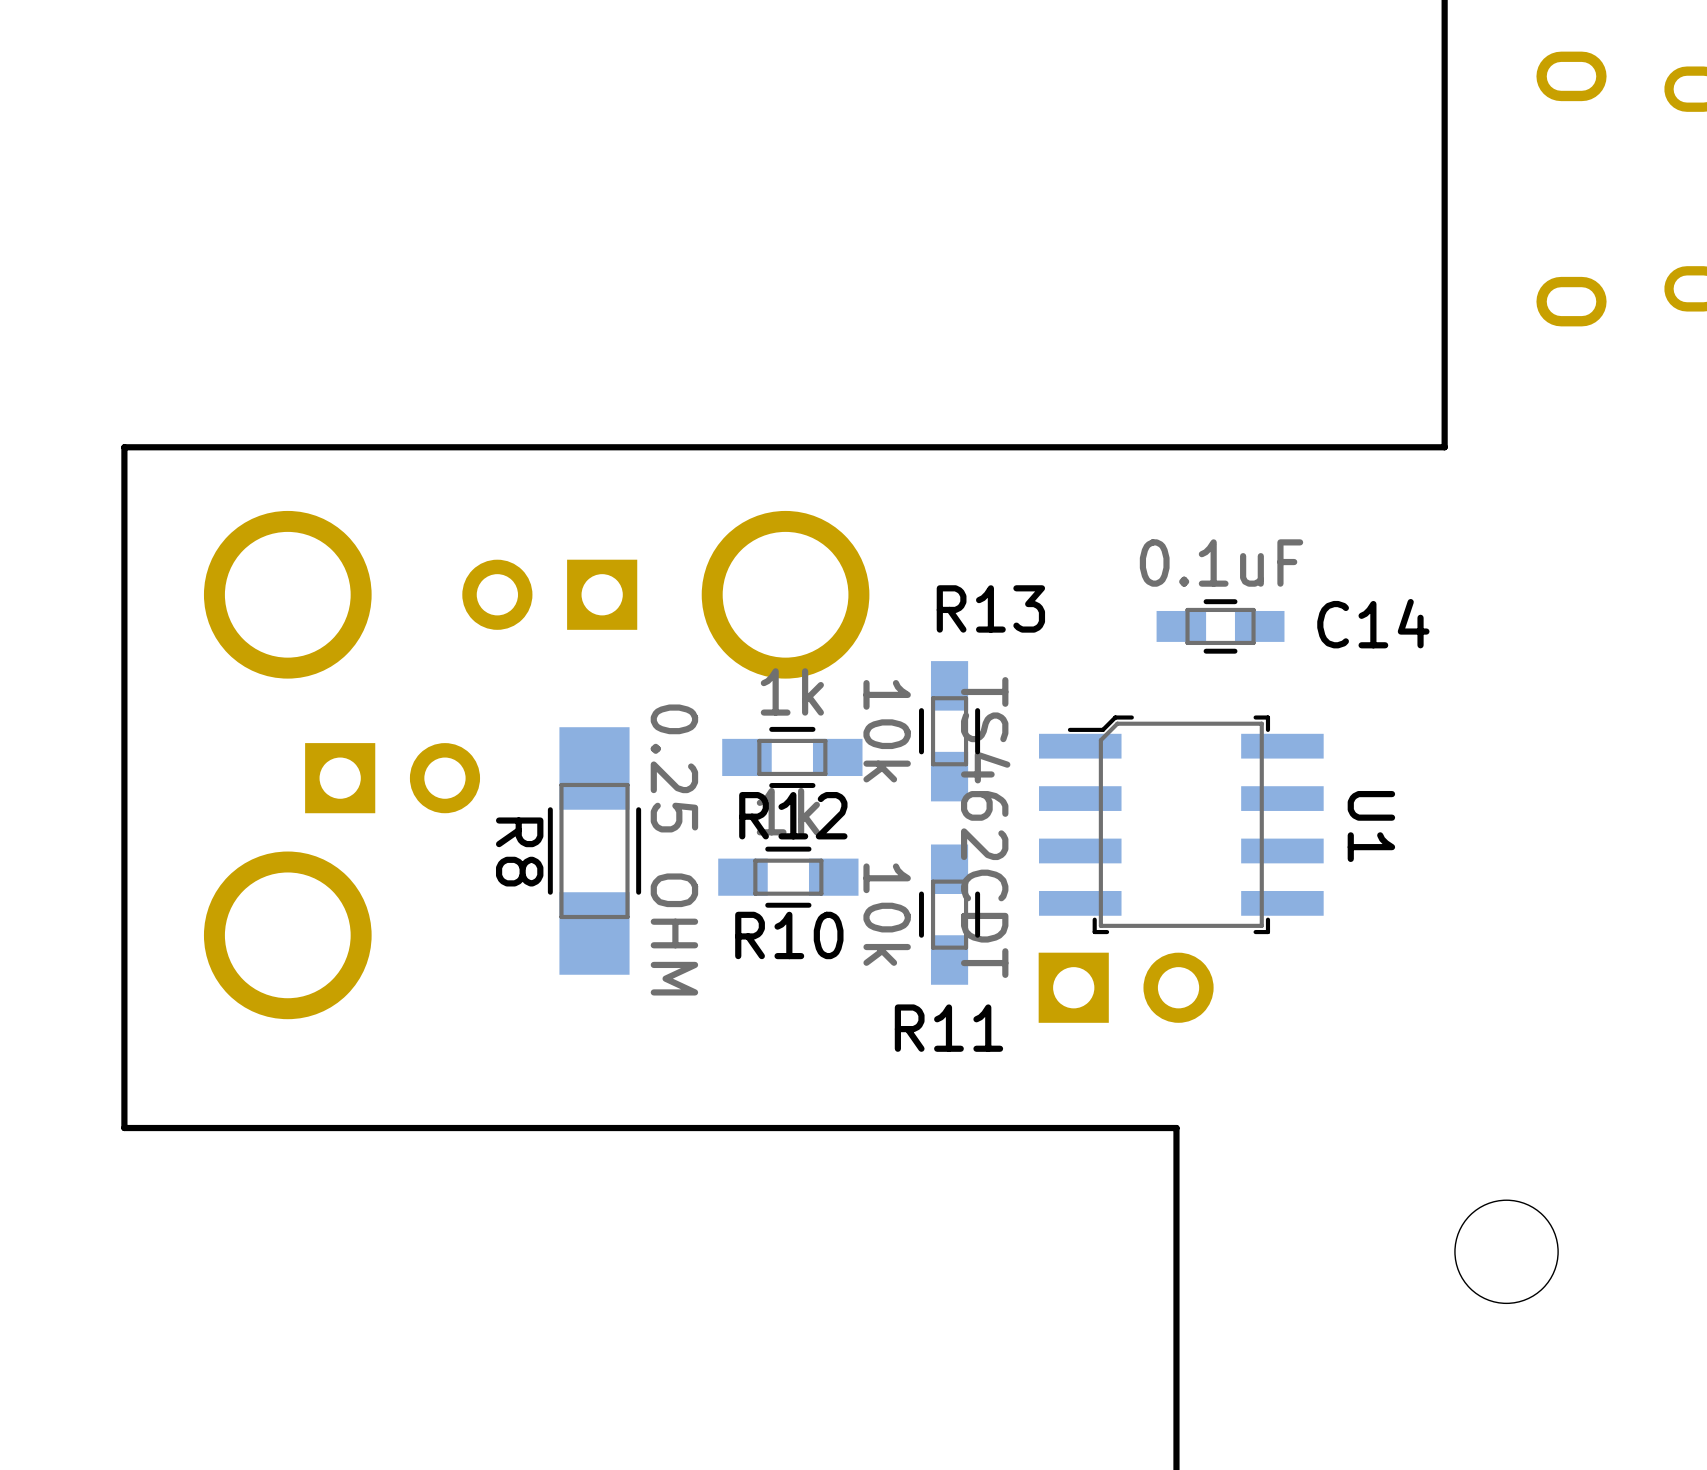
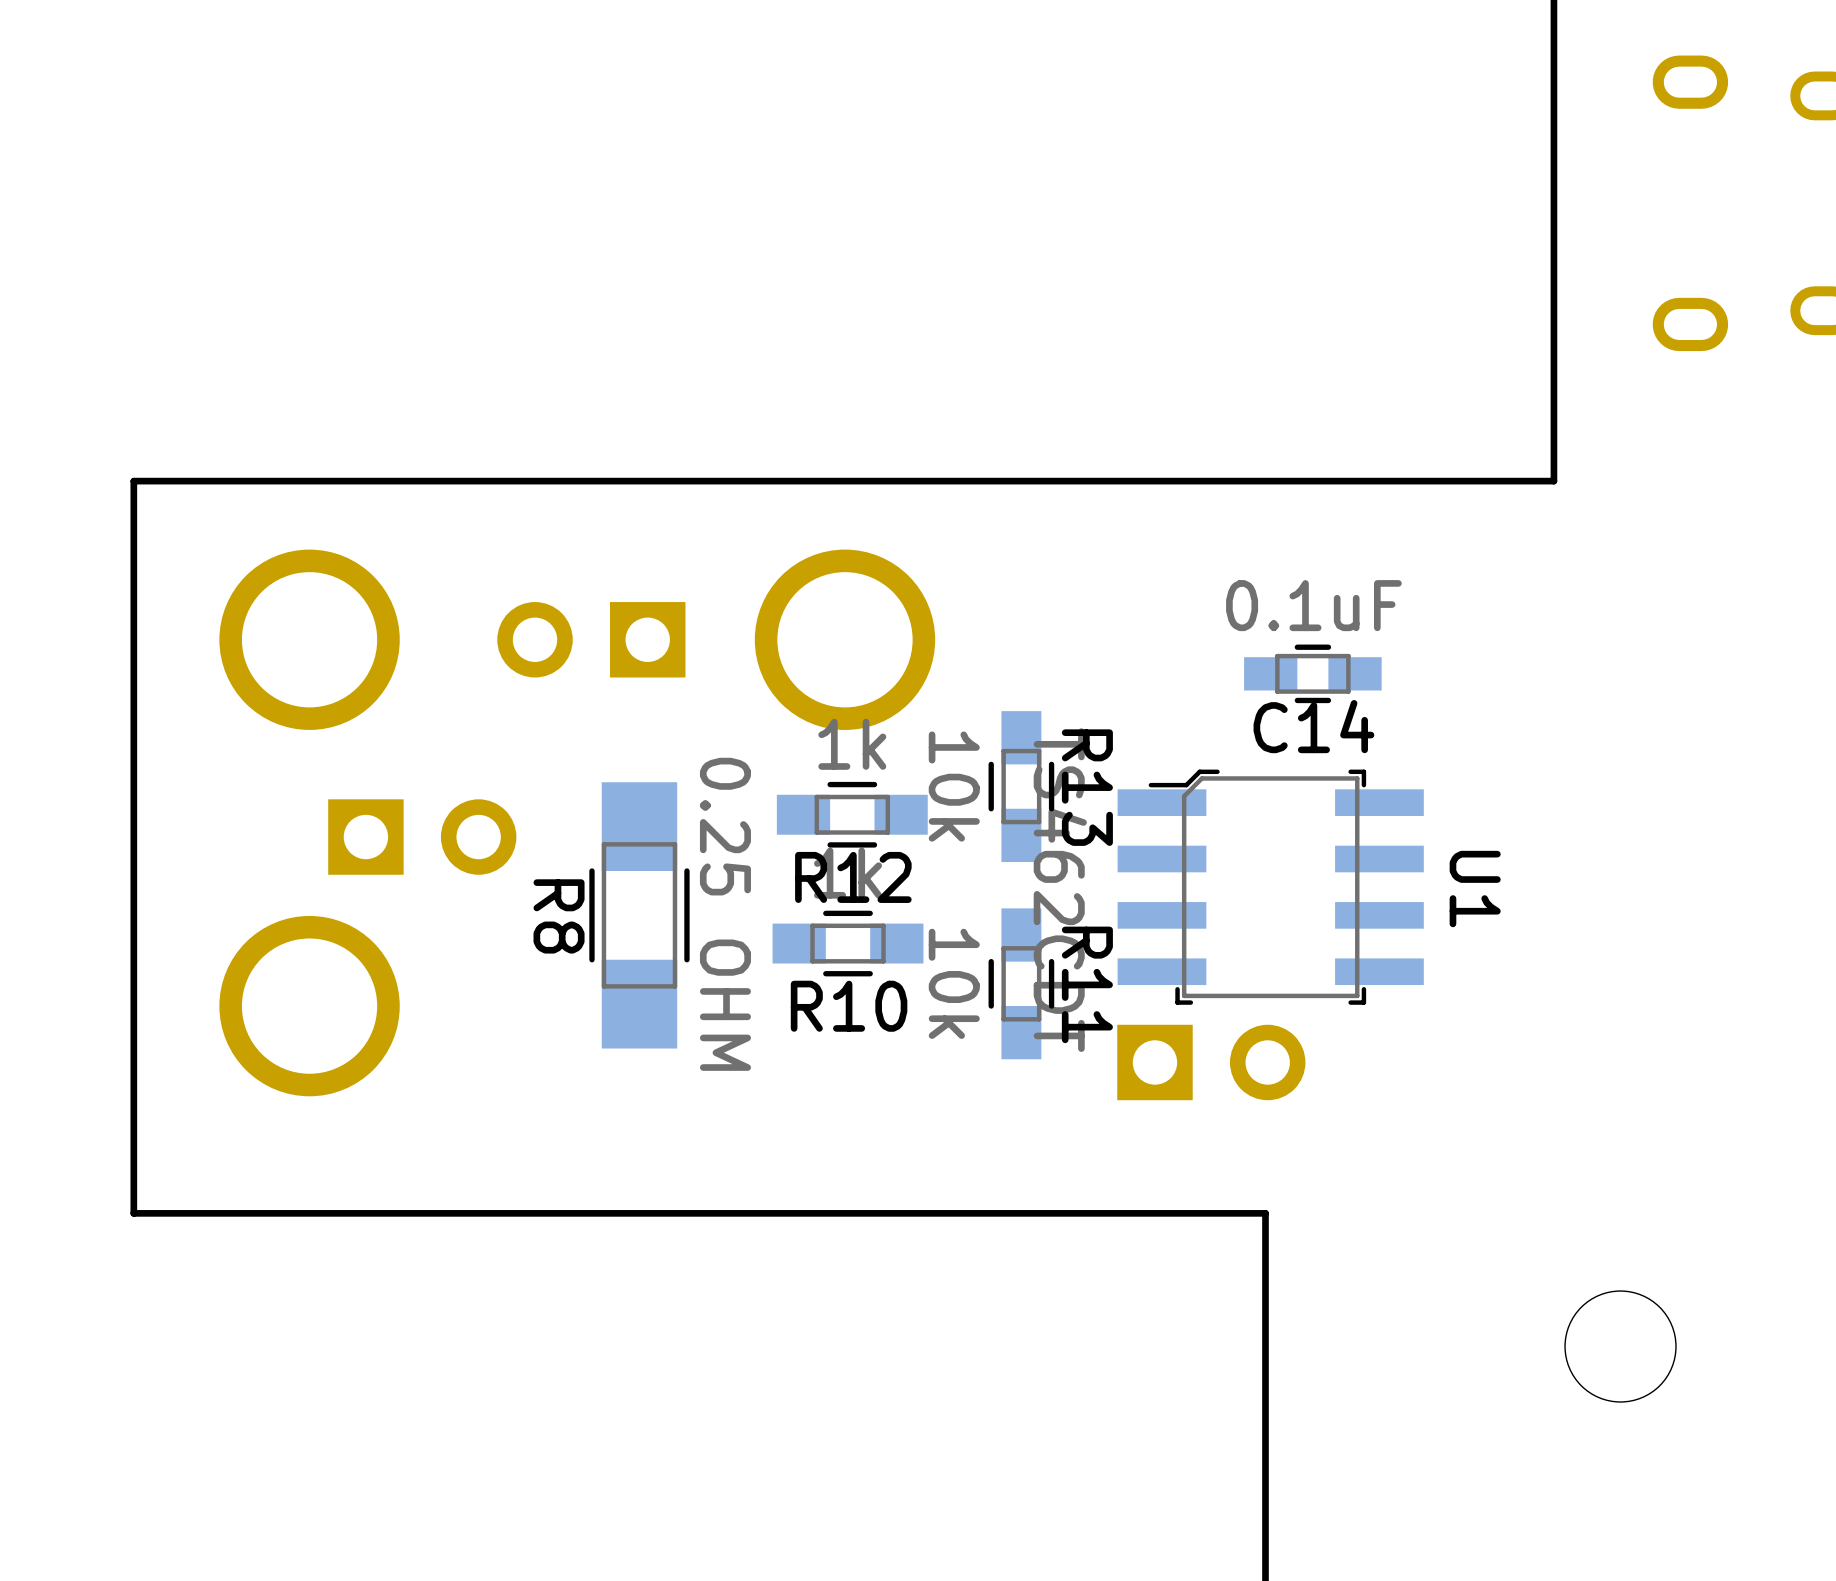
R13 name rotation: 0° (990, 608) -> 90° clockwise (1087, 787)
C14 name position: C14 (1373, 623) -> C14 (1313, 726)
R11 name rotation: 0° (948, 1028) -> 90° clockwise (1087, 984)

